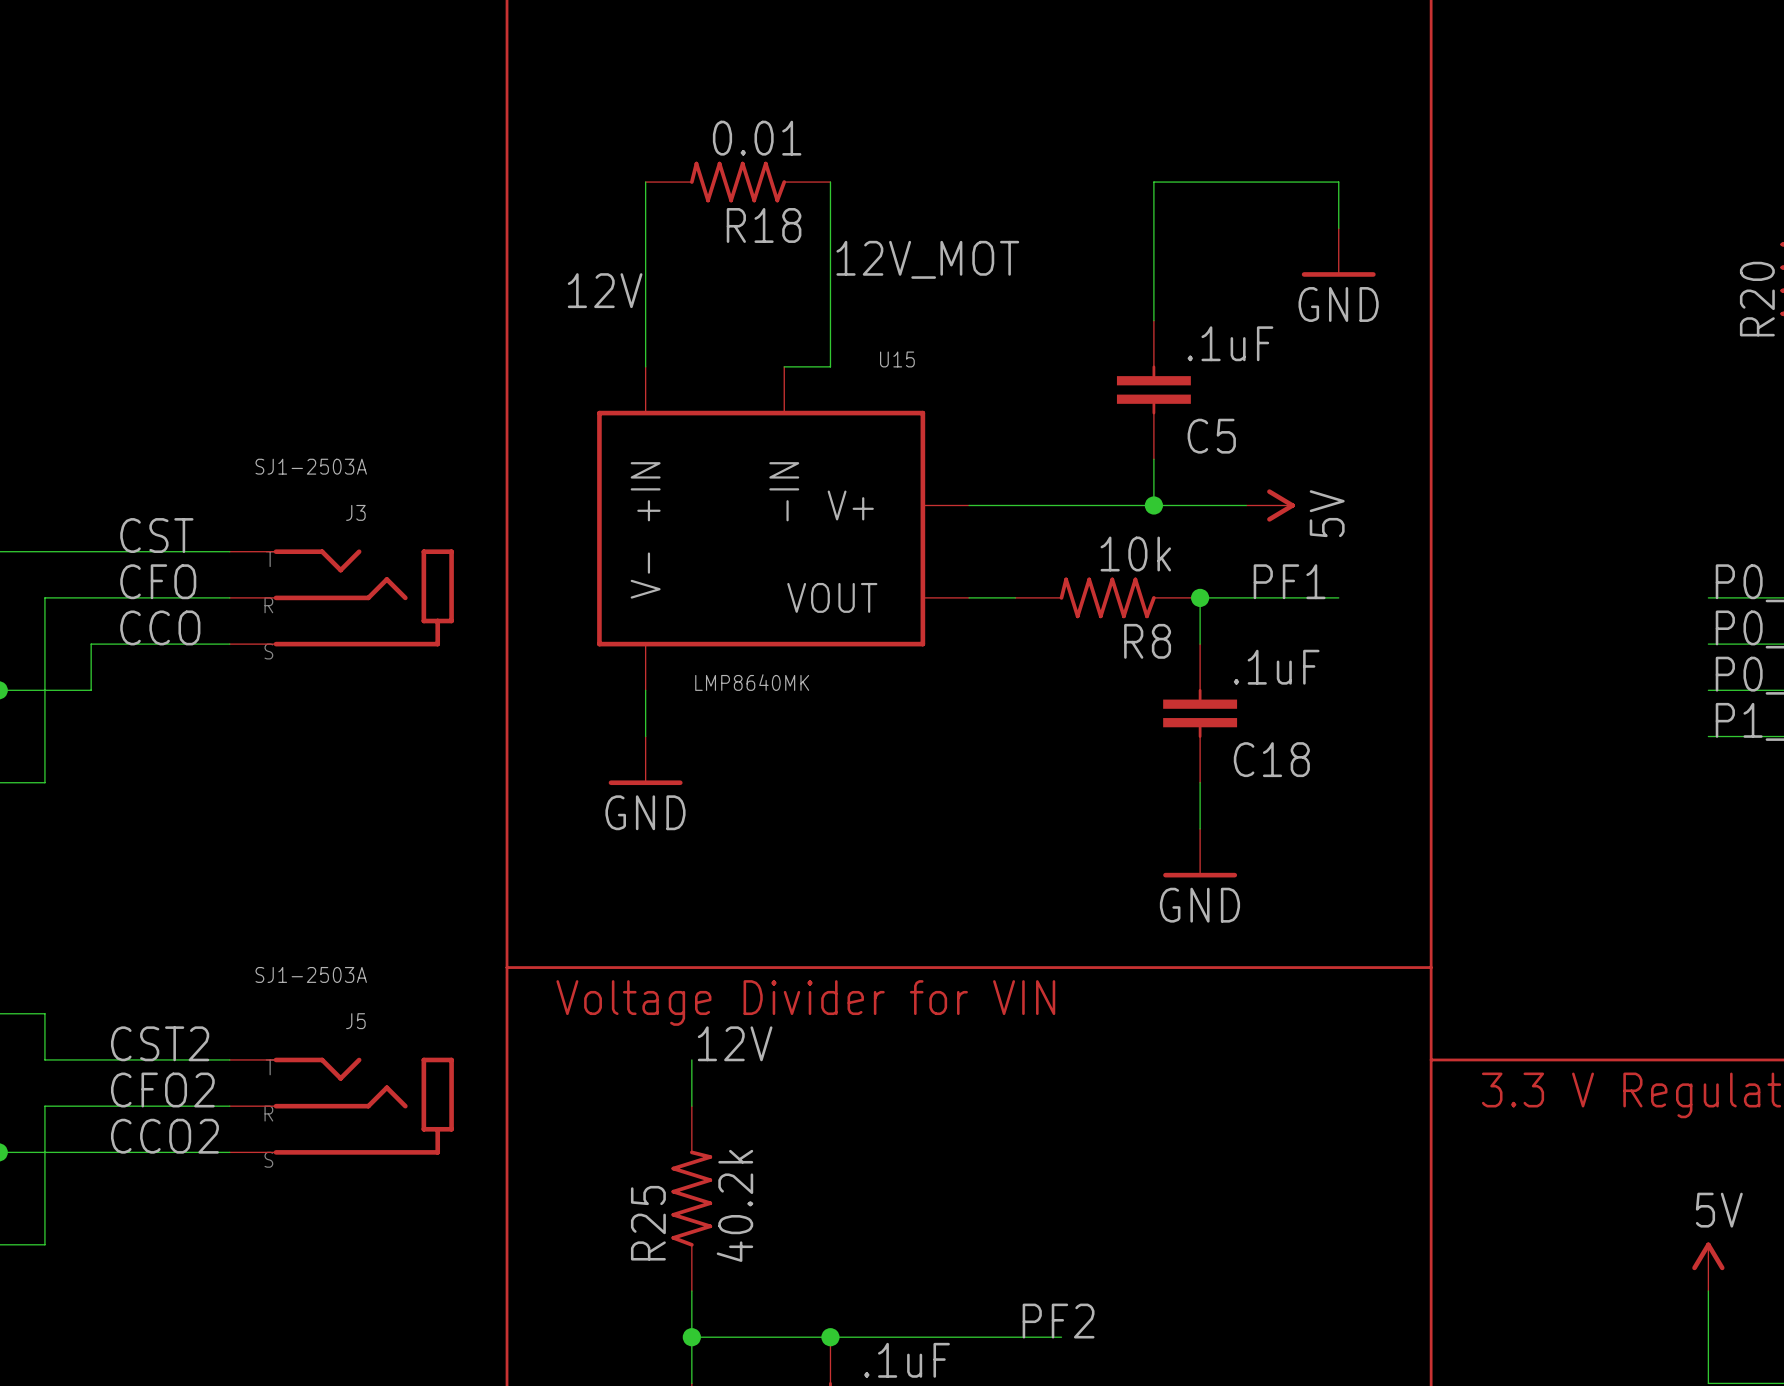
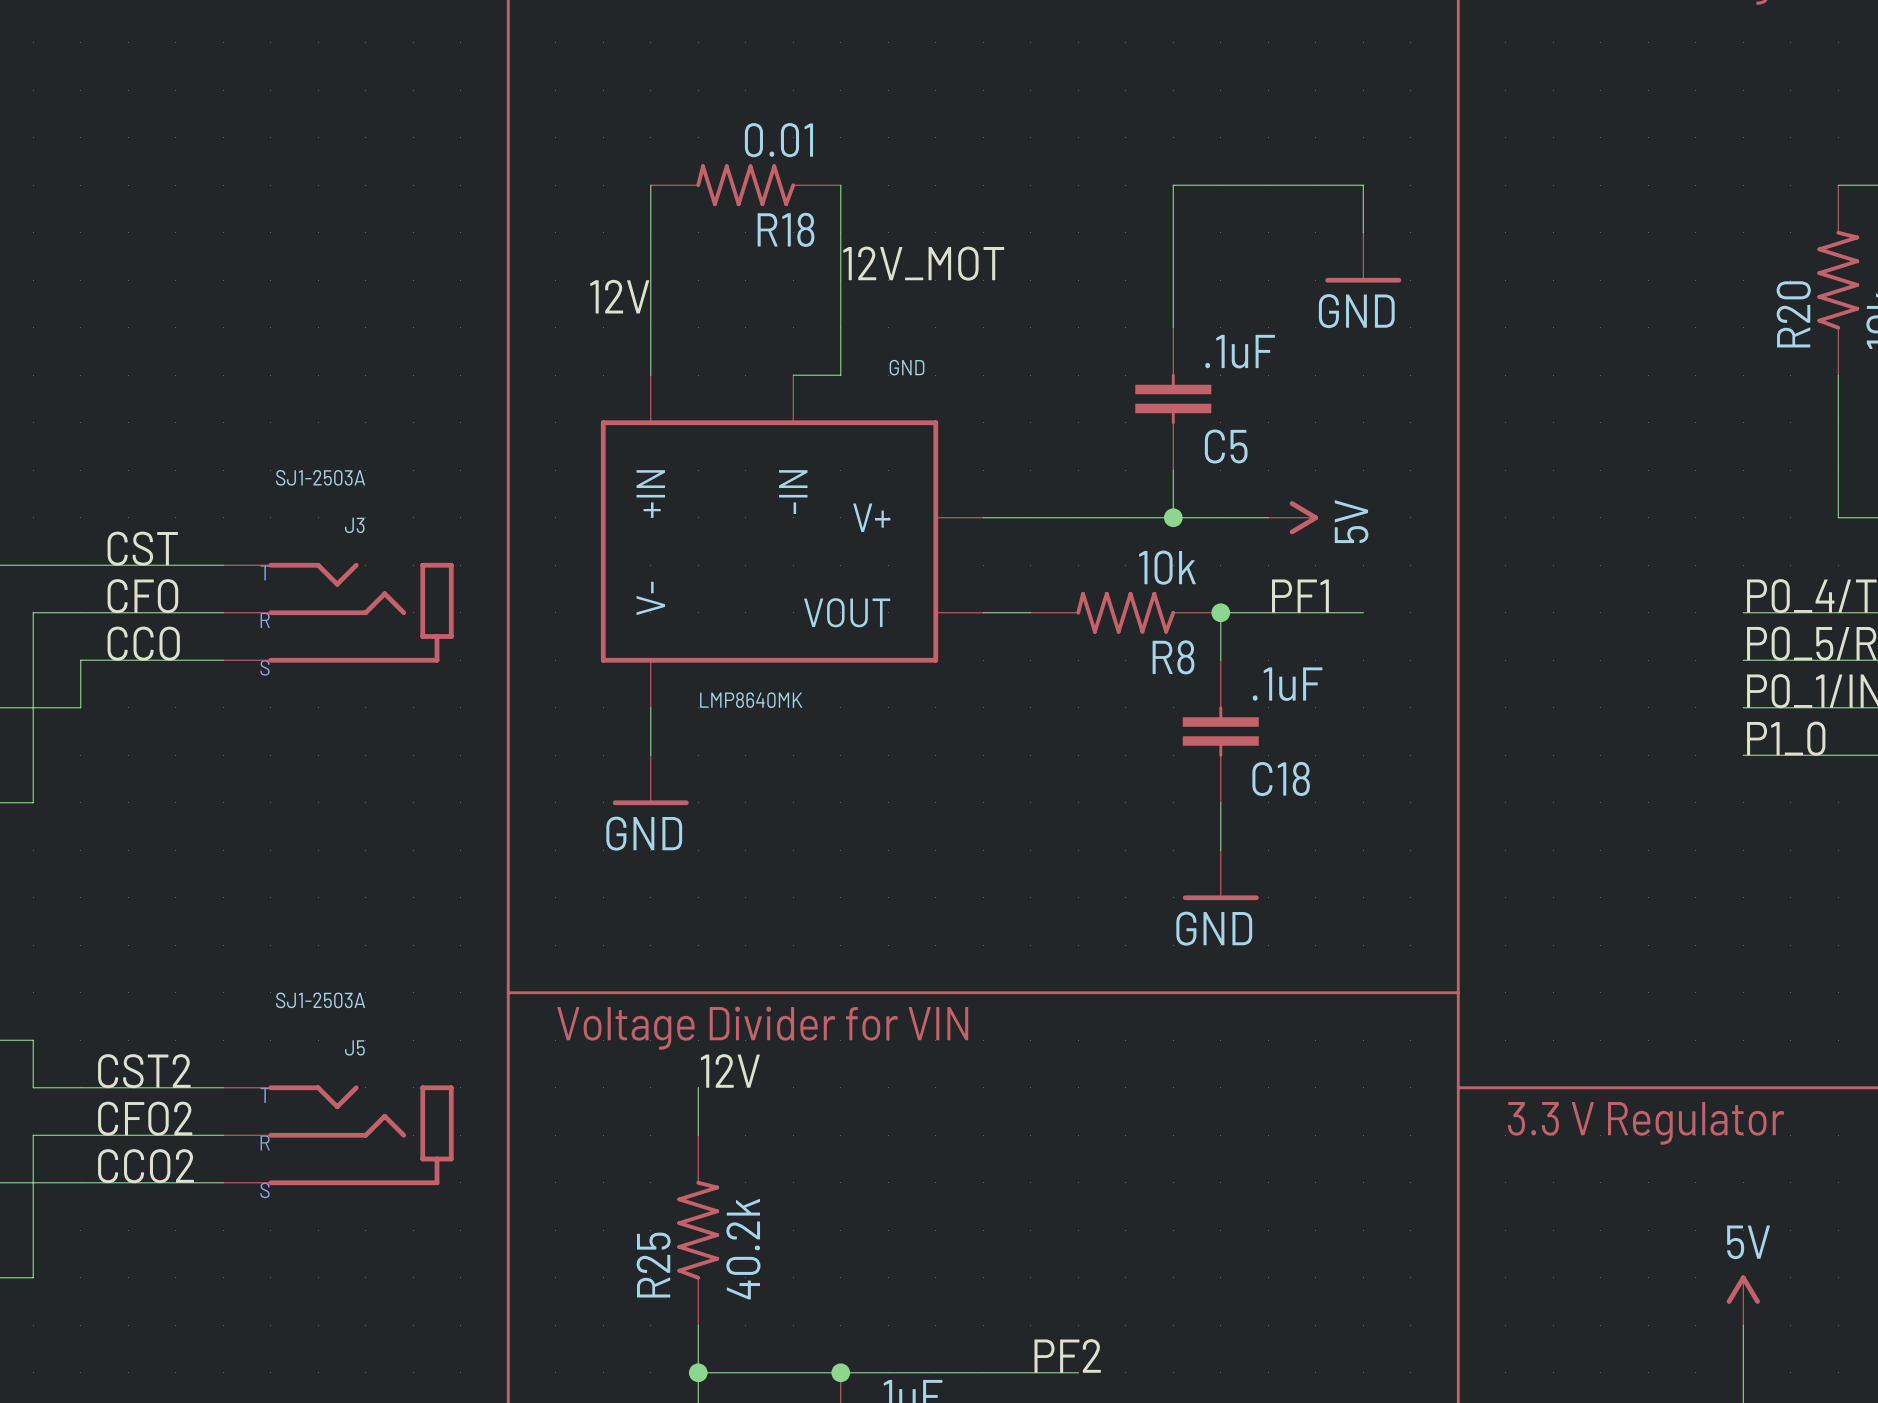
U15 name: U15 (897, 359) -> GND (907, 367)

